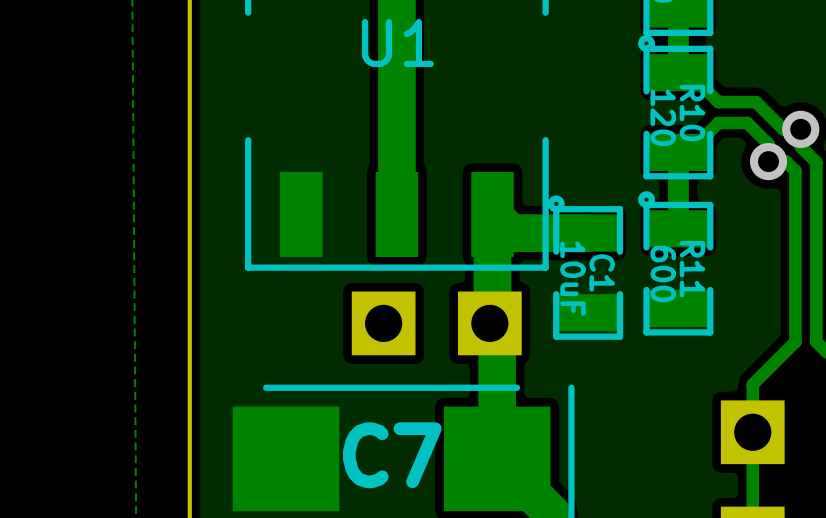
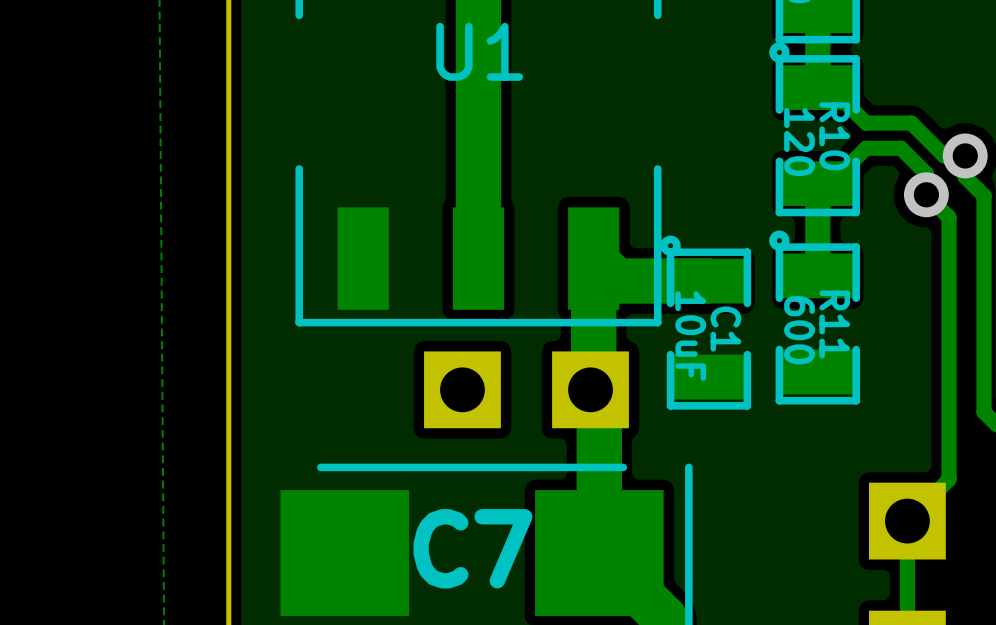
track: (768, 161) (785, 161) (795, 171) (795, 341) (752, 384) (752, 429) -> (926, 194) (949, 217) (949, 479) (907, 521)

